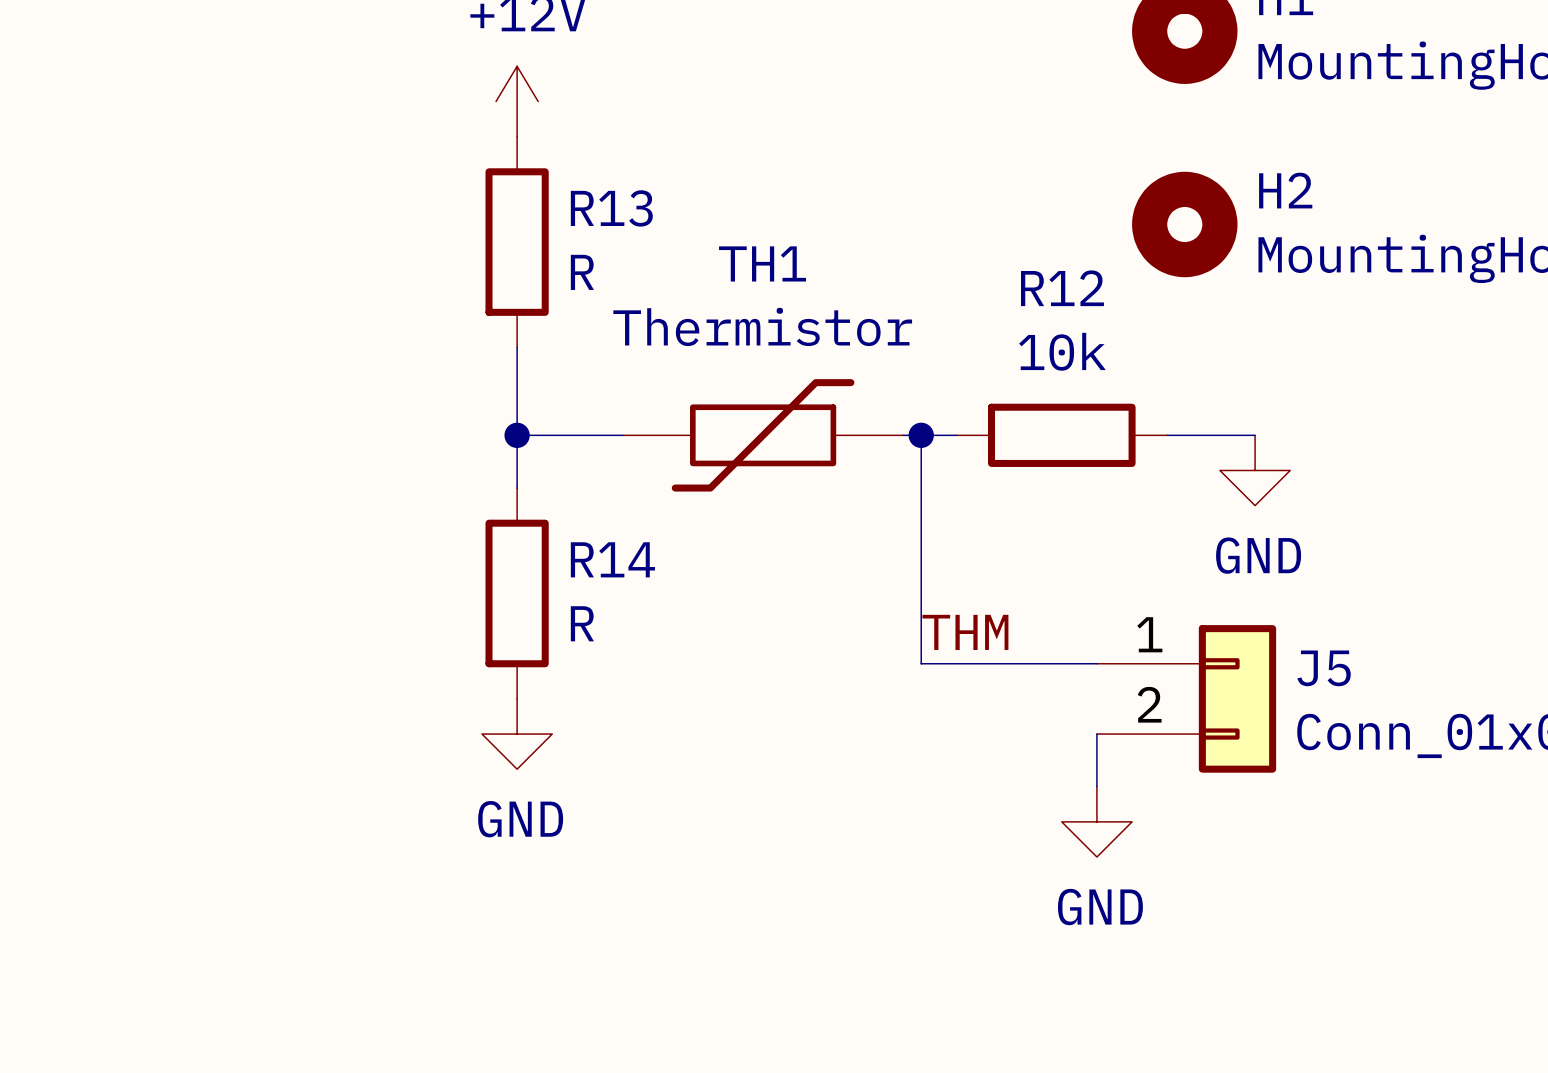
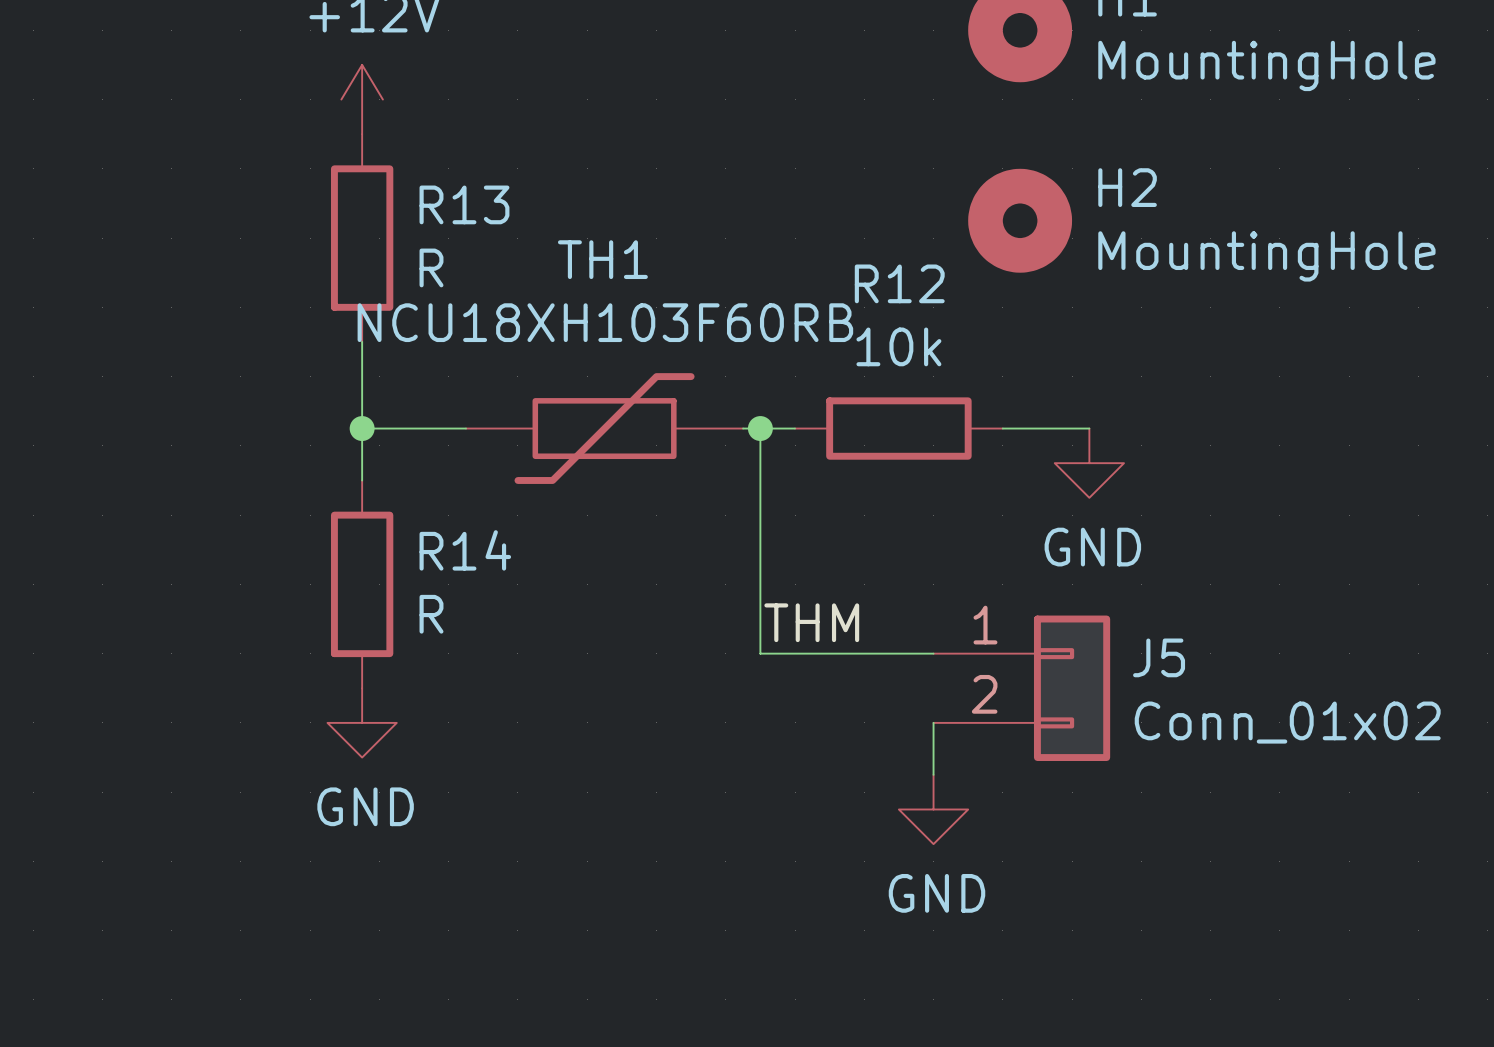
TH1 value: Thermistor (762, 326) -> NCU18XH103F60RB (605, 322)

